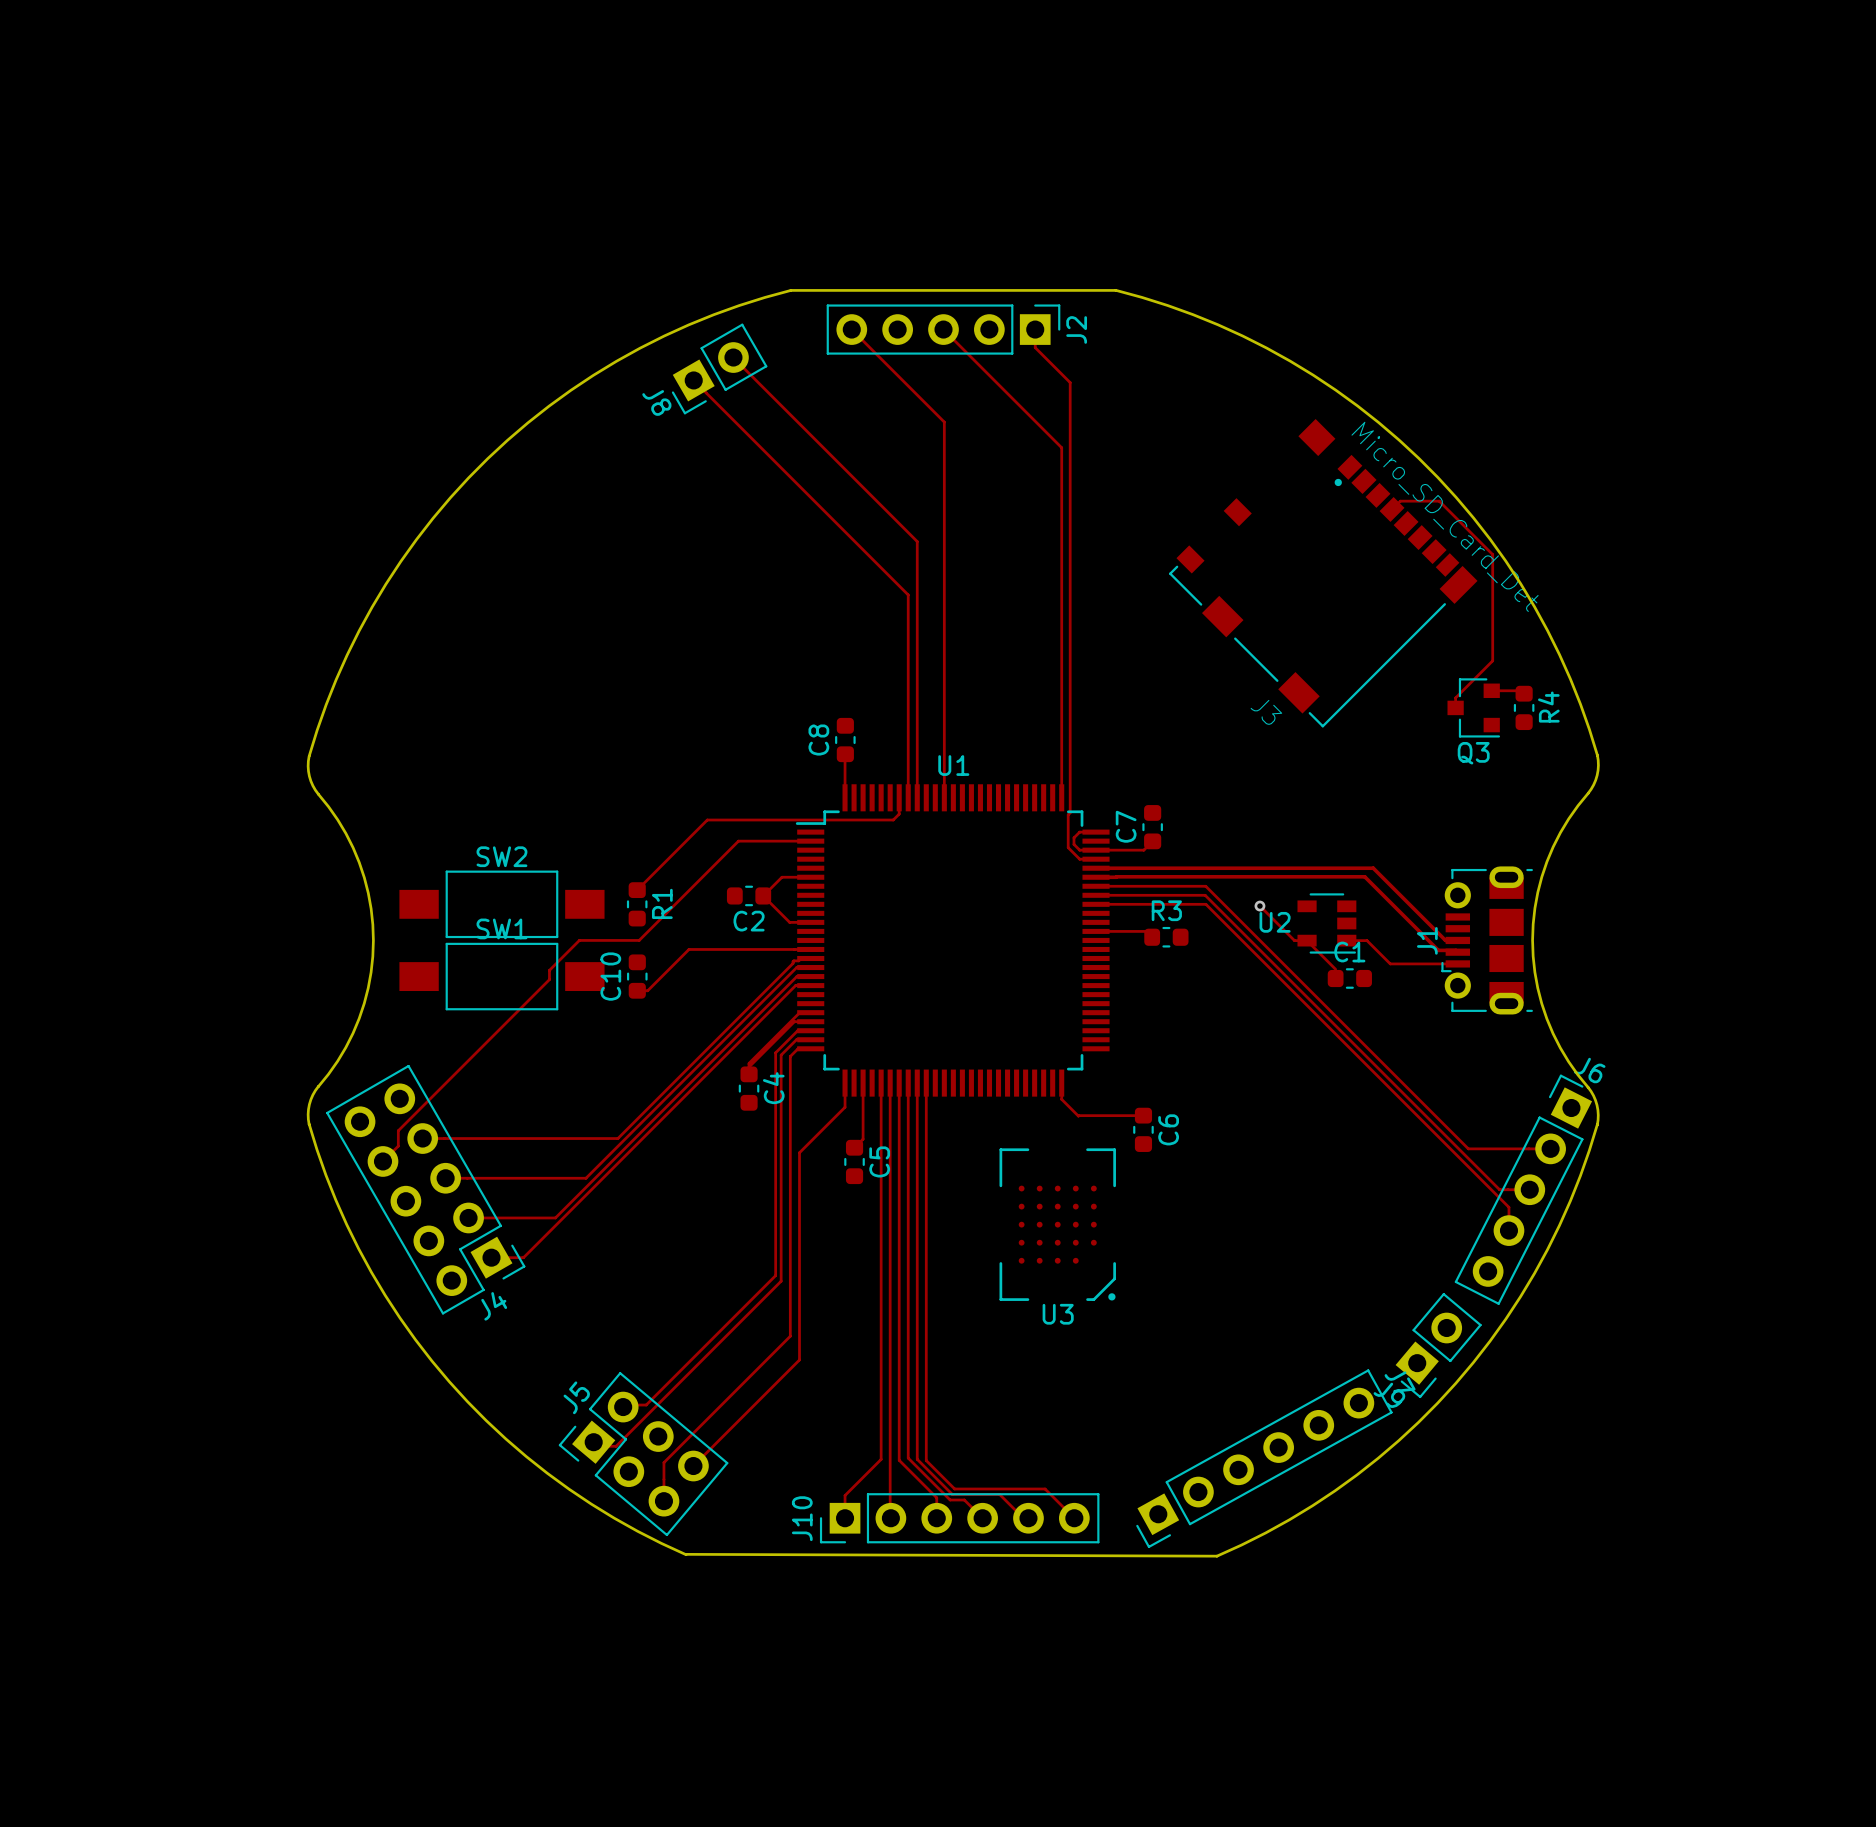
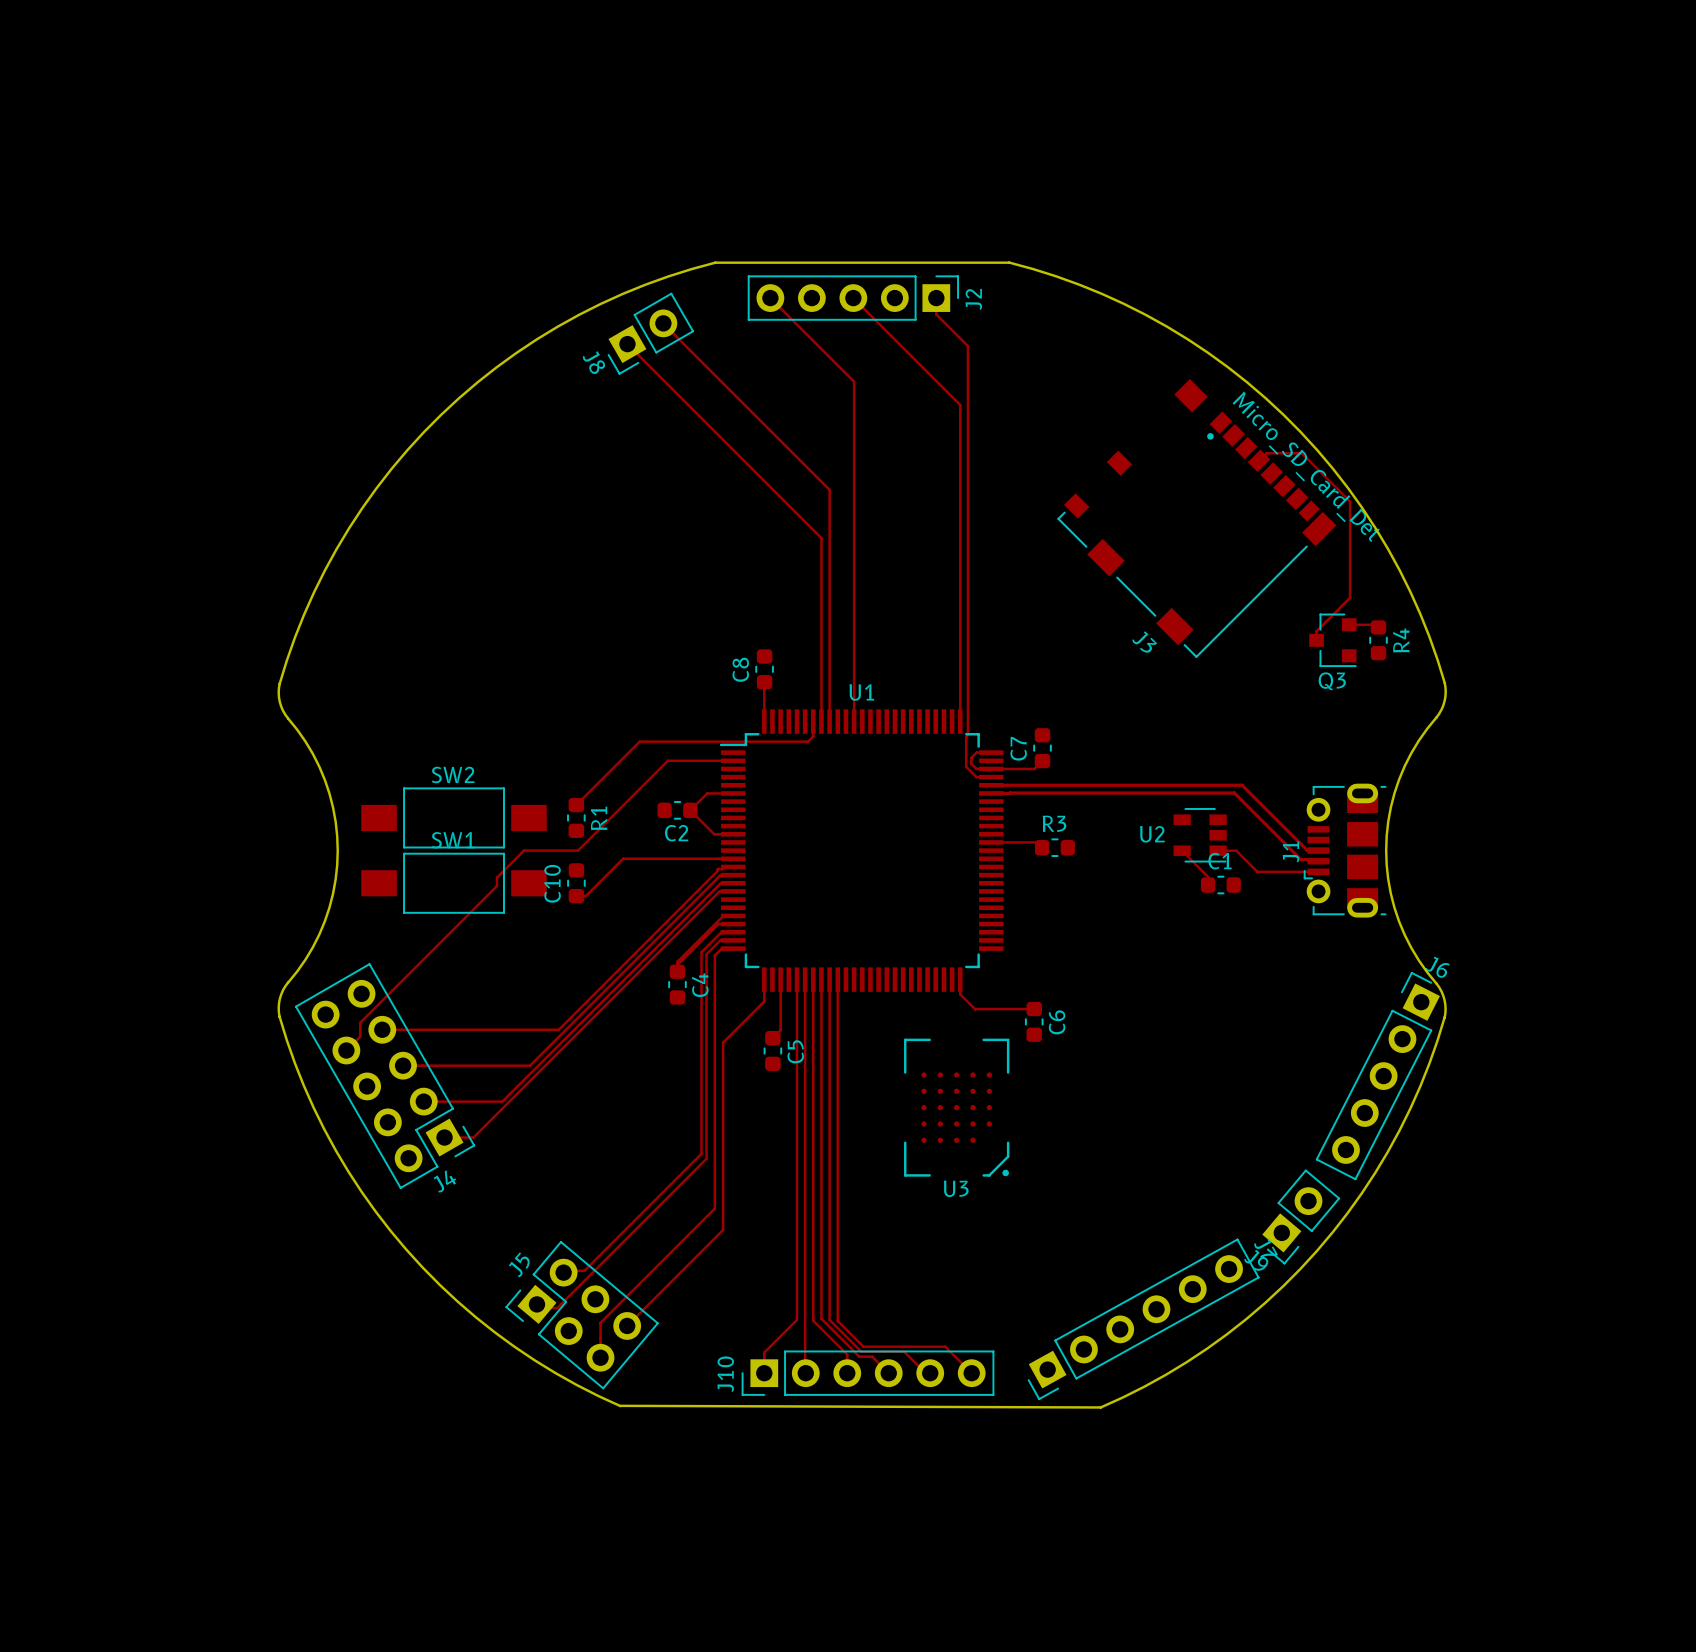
track: (1096, 886) (1205, 886) (1468, 1148) (1550, 1148) -> none
track: (1096, 895) (1205, 895) (1499, 1189) (1529, 1189) -> none
track: (1096, 904) (1205, 904) (1508, 1207) (1508, 1230) -> none
track: (1259, 906) (1294, 940) (1307, 940) -> none
via: (1259, 906) -> none

